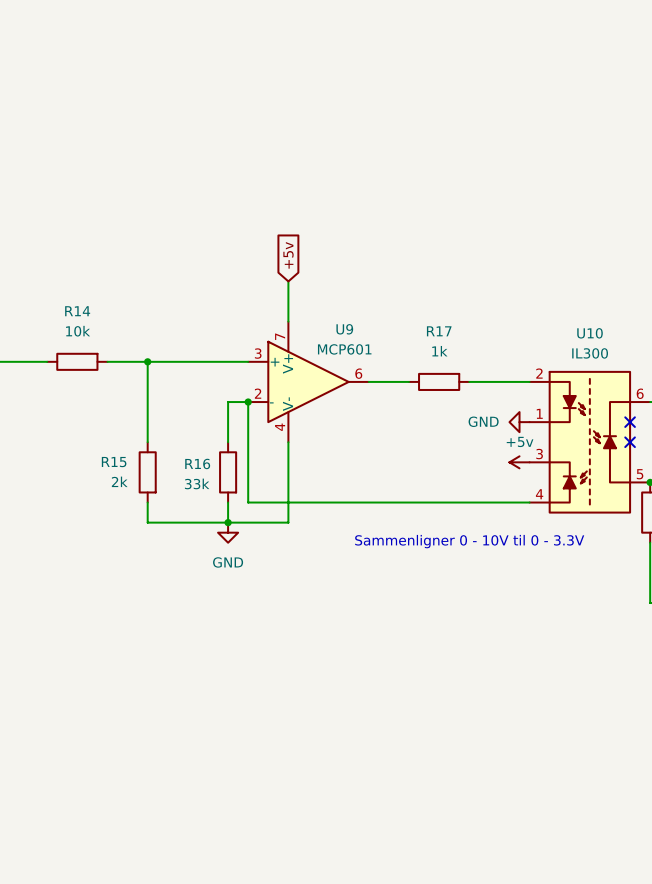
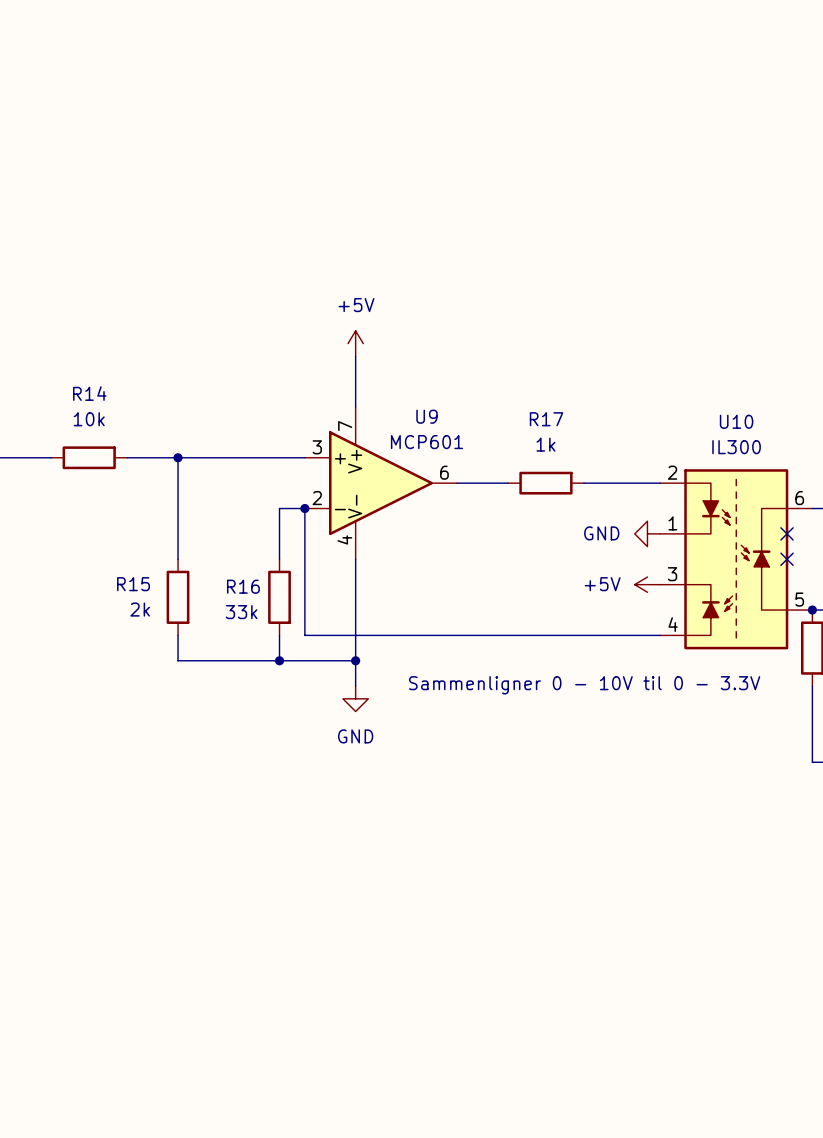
global label: +5v (288, 255) -> none
power symbol: none -> +5V (355, 343)
power symbol: +5v (519, 462) -> +5V (647, 584)
wire: none -> (355, 660) (355, 686)
junction: none -> (355, 660)
power symbol position: GND (228, 532) -> GND (355, 698)

